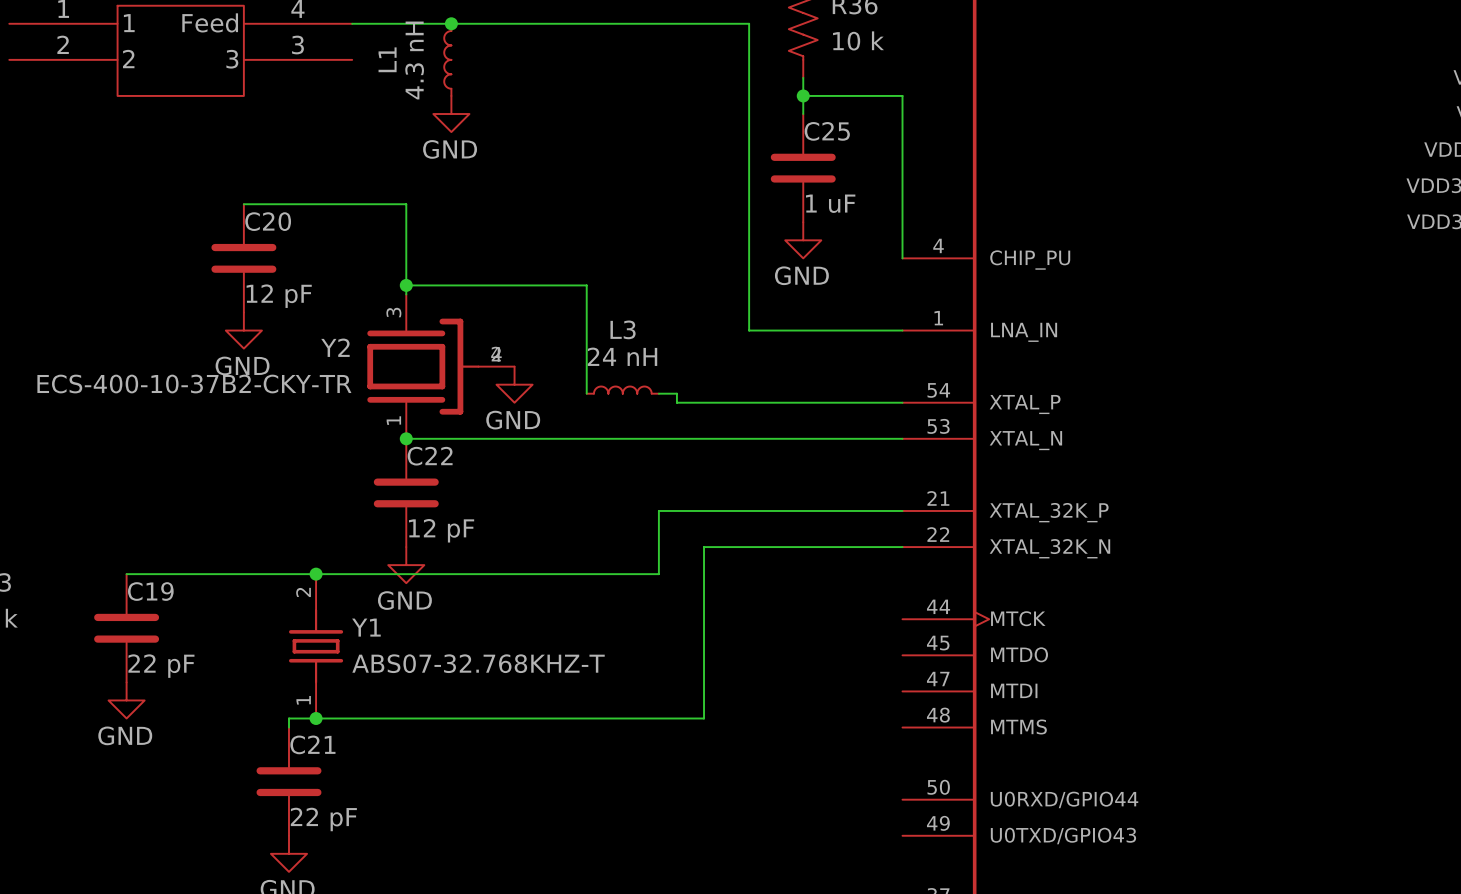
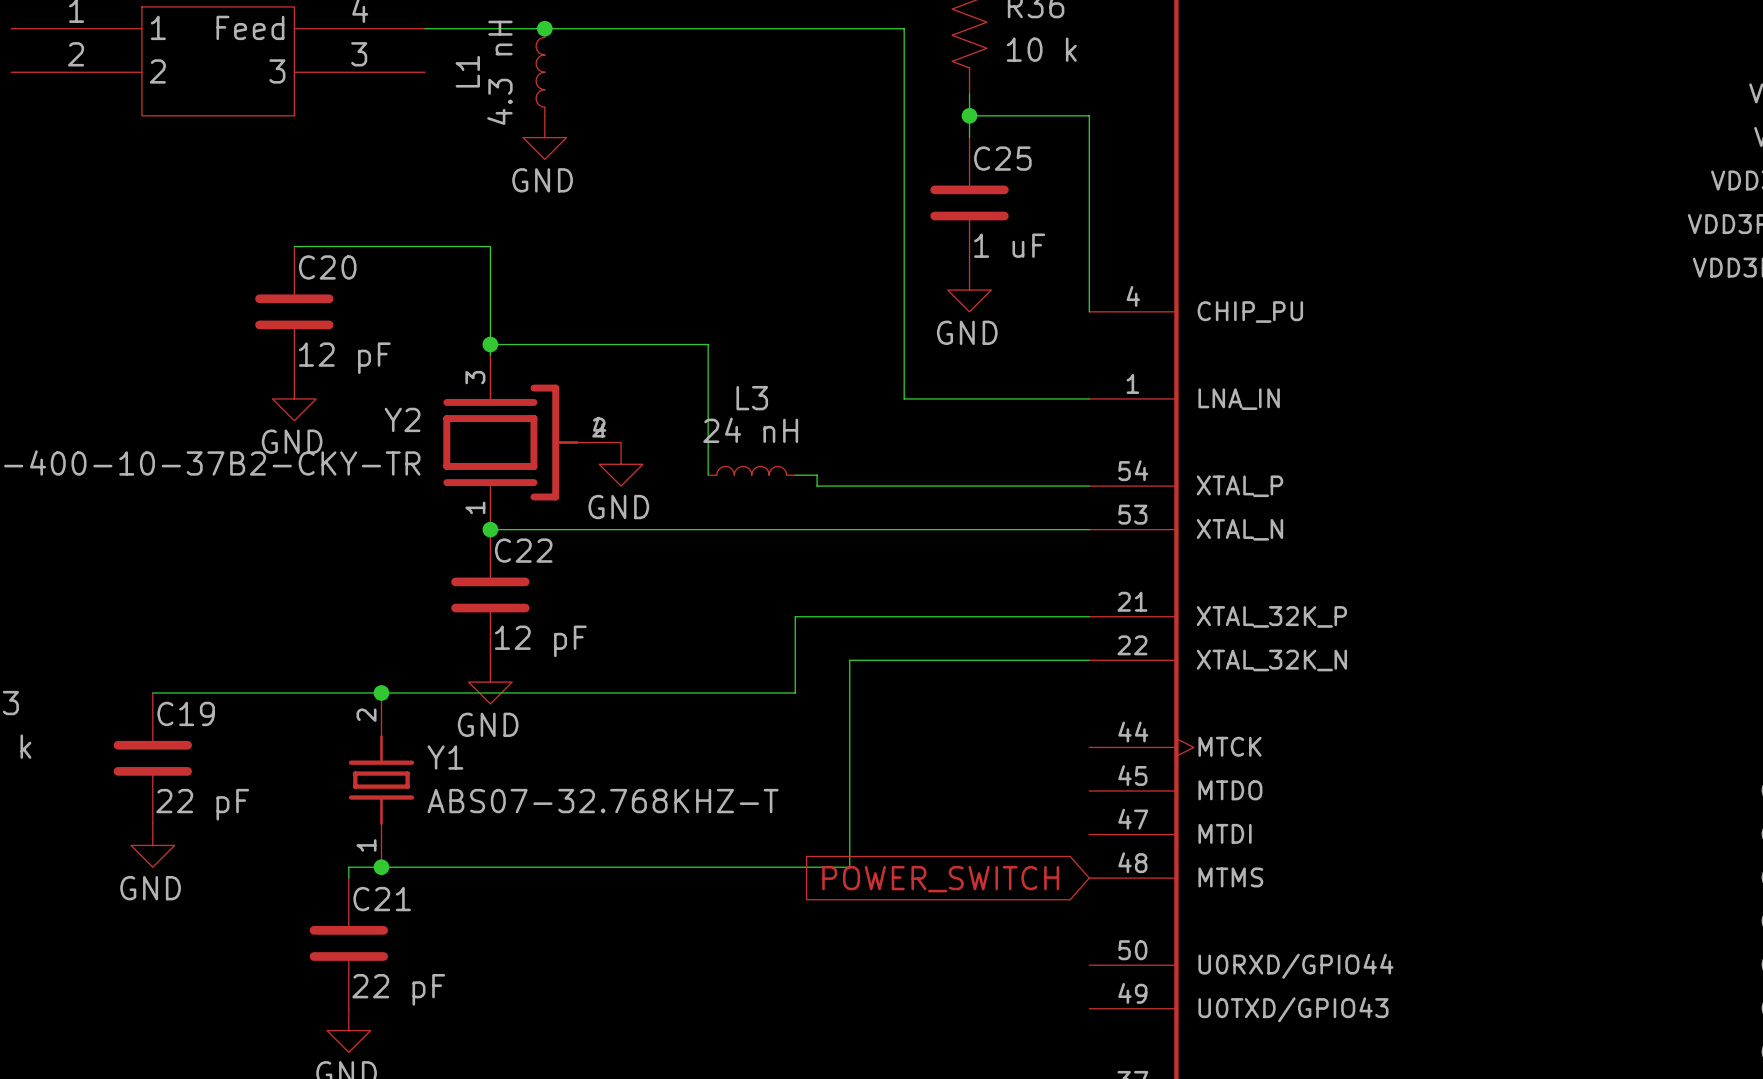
global label: none -> POWER_SWITCH (940, 879)

